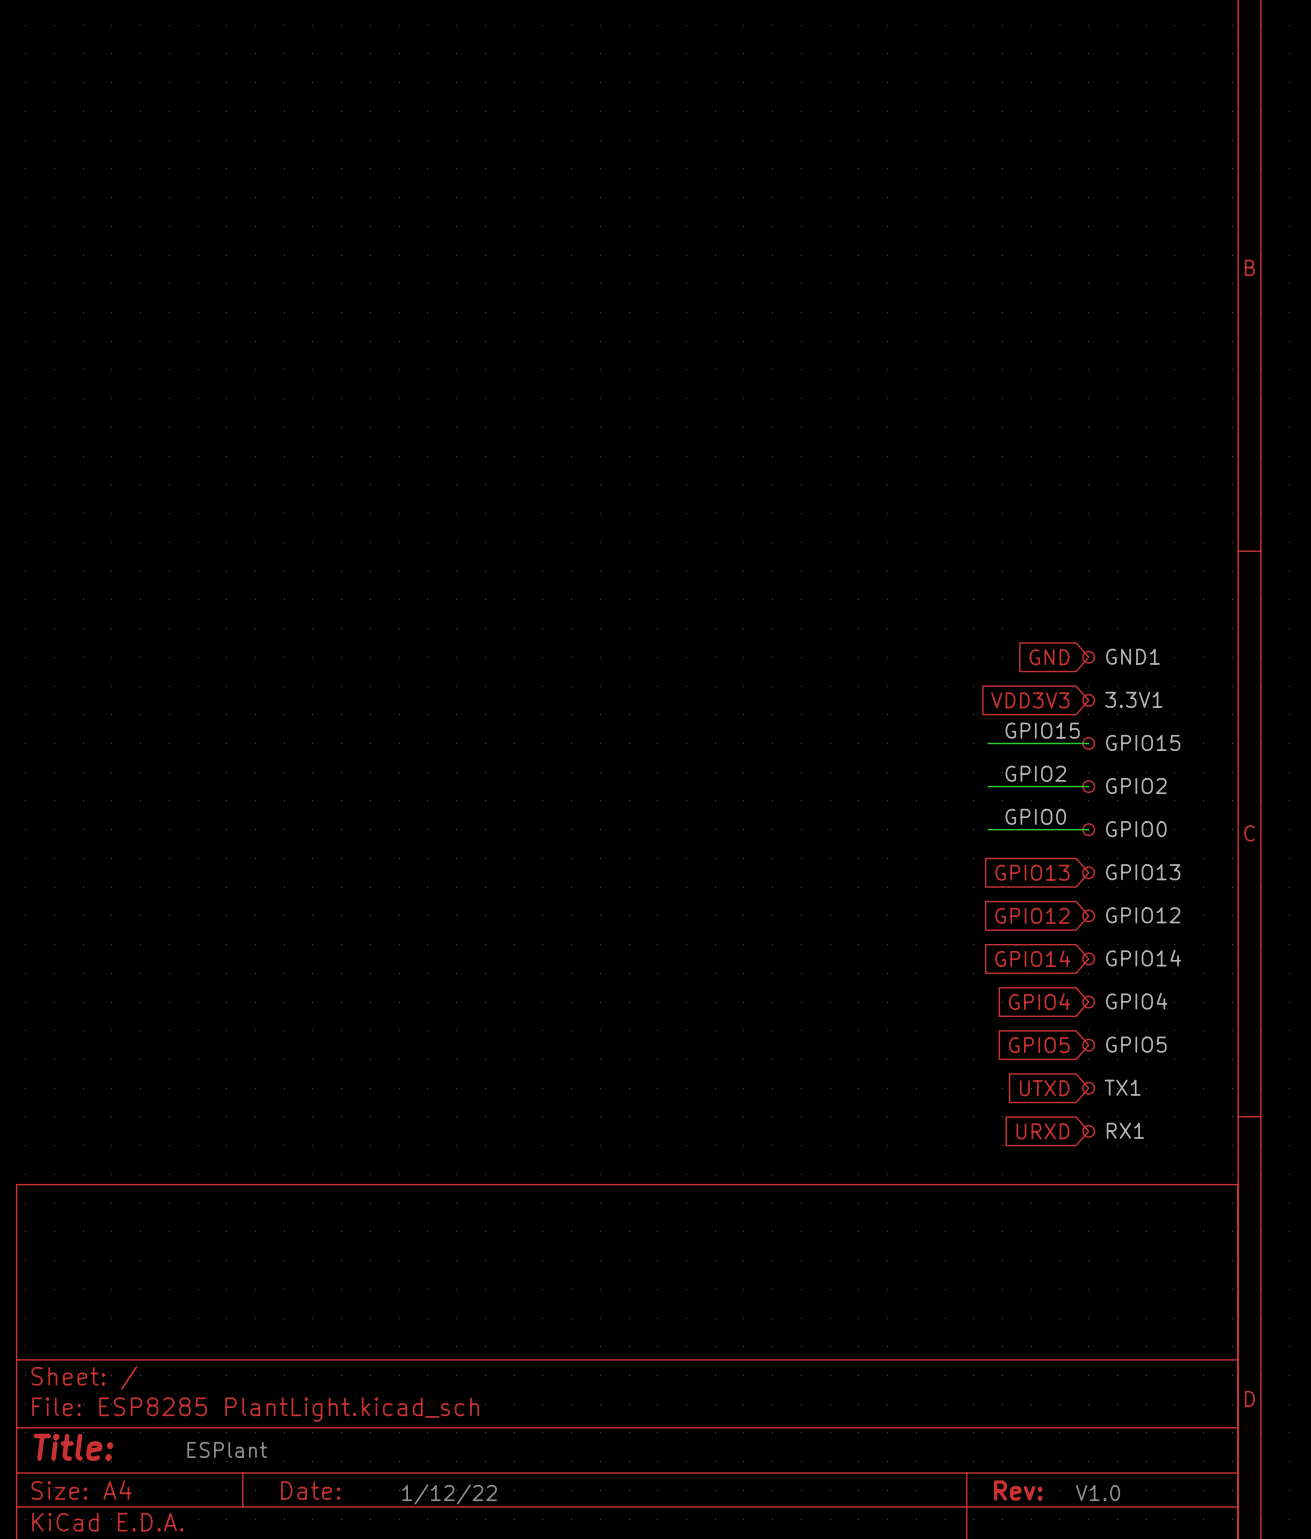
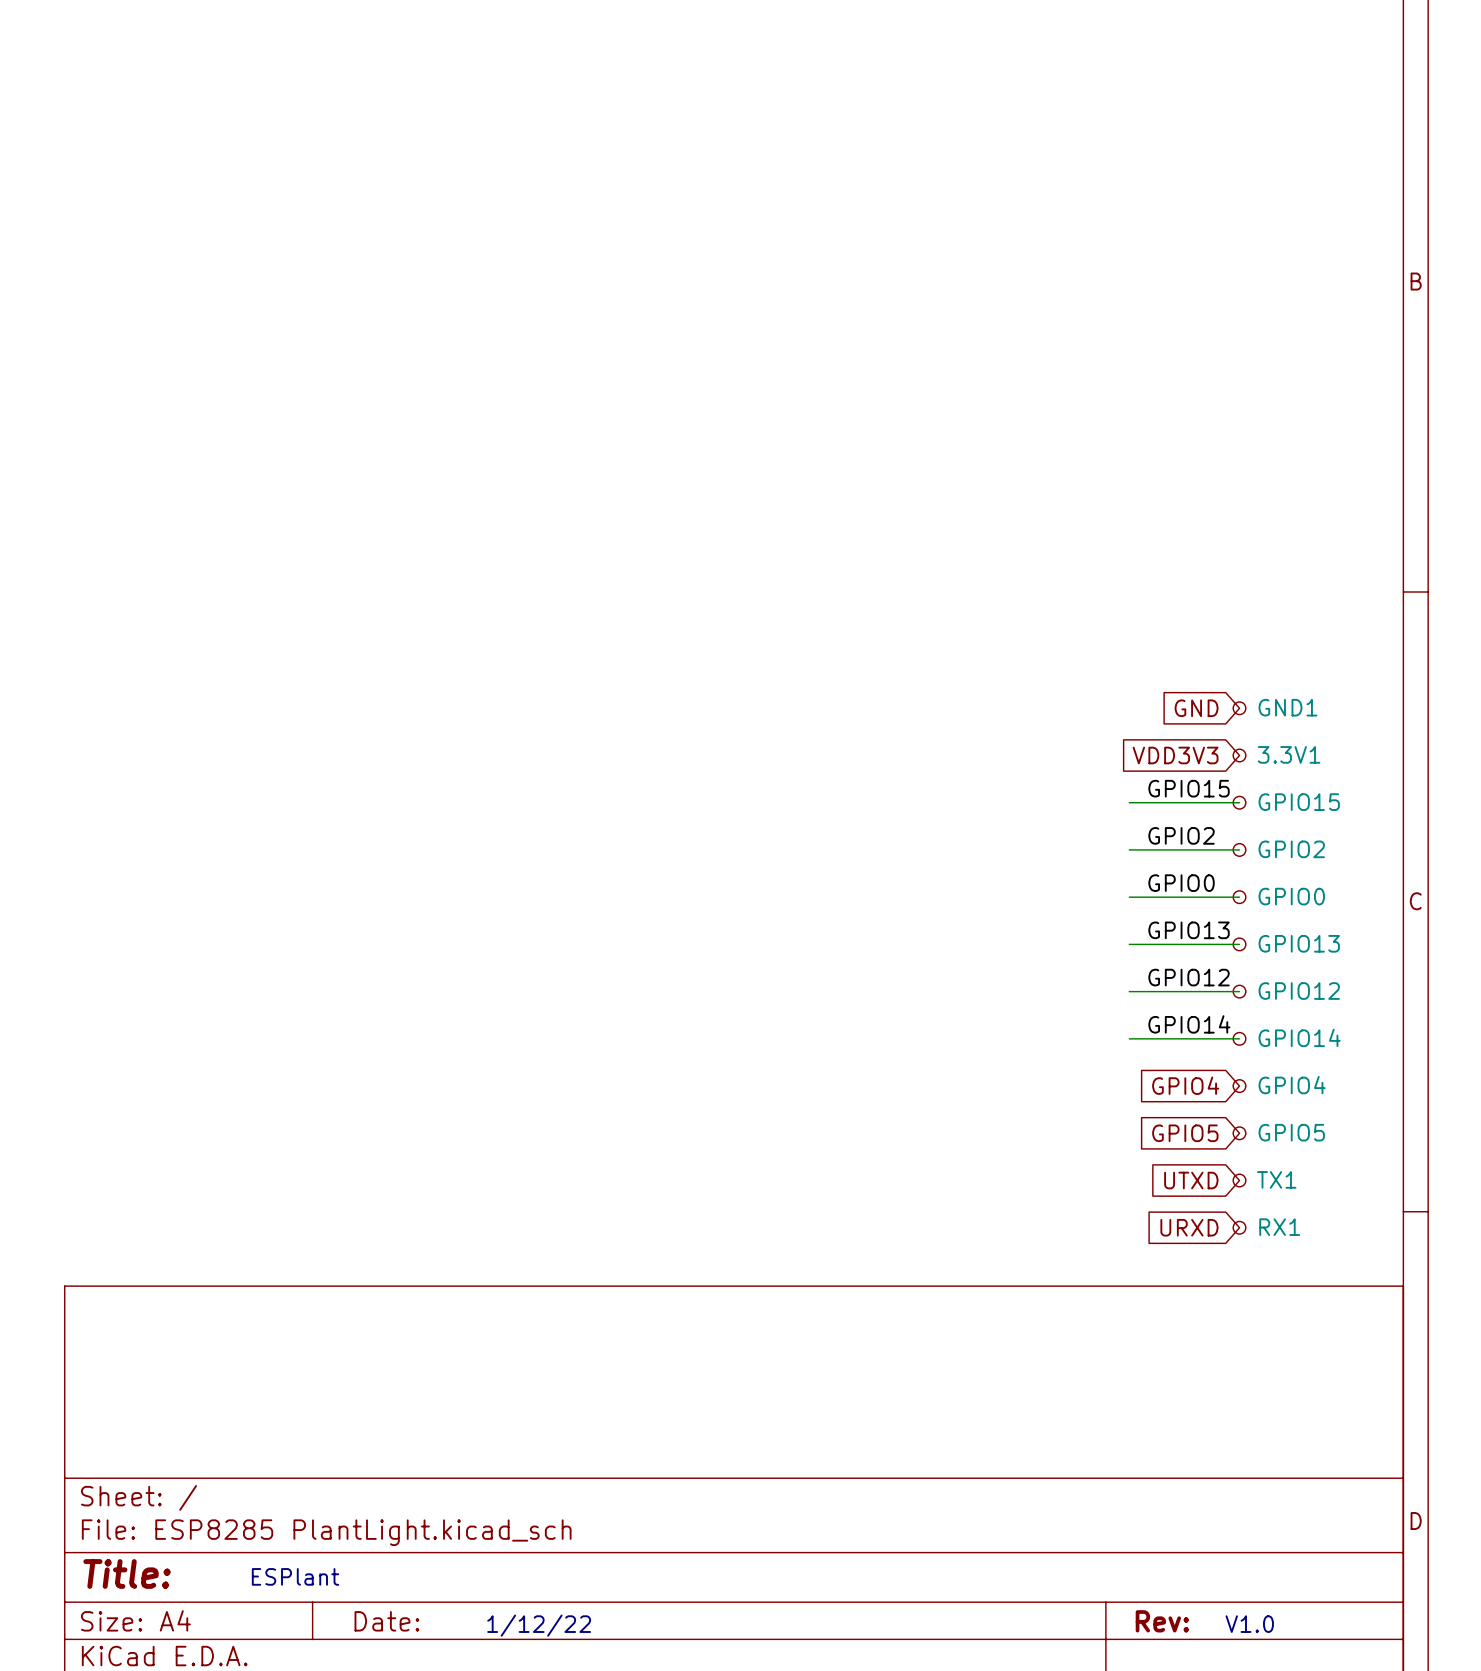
label: none -> GPIO13 (1189, 930)
wire: none -> (1129, 944) (1239, 944)
global label: GPIO13 (1032, 872) -> none
label: none -> GPIO12 (1189, 977)
wire: none -> (1129, 991) (1239, 991)
global label: GPIO12 (1032, 915) -> none
label: none -> GPIO14 (1189, 1024)
wire: none -> (1129, 1038) (1239, 1038)
global label: GPIO14 (1032, 958) -> none

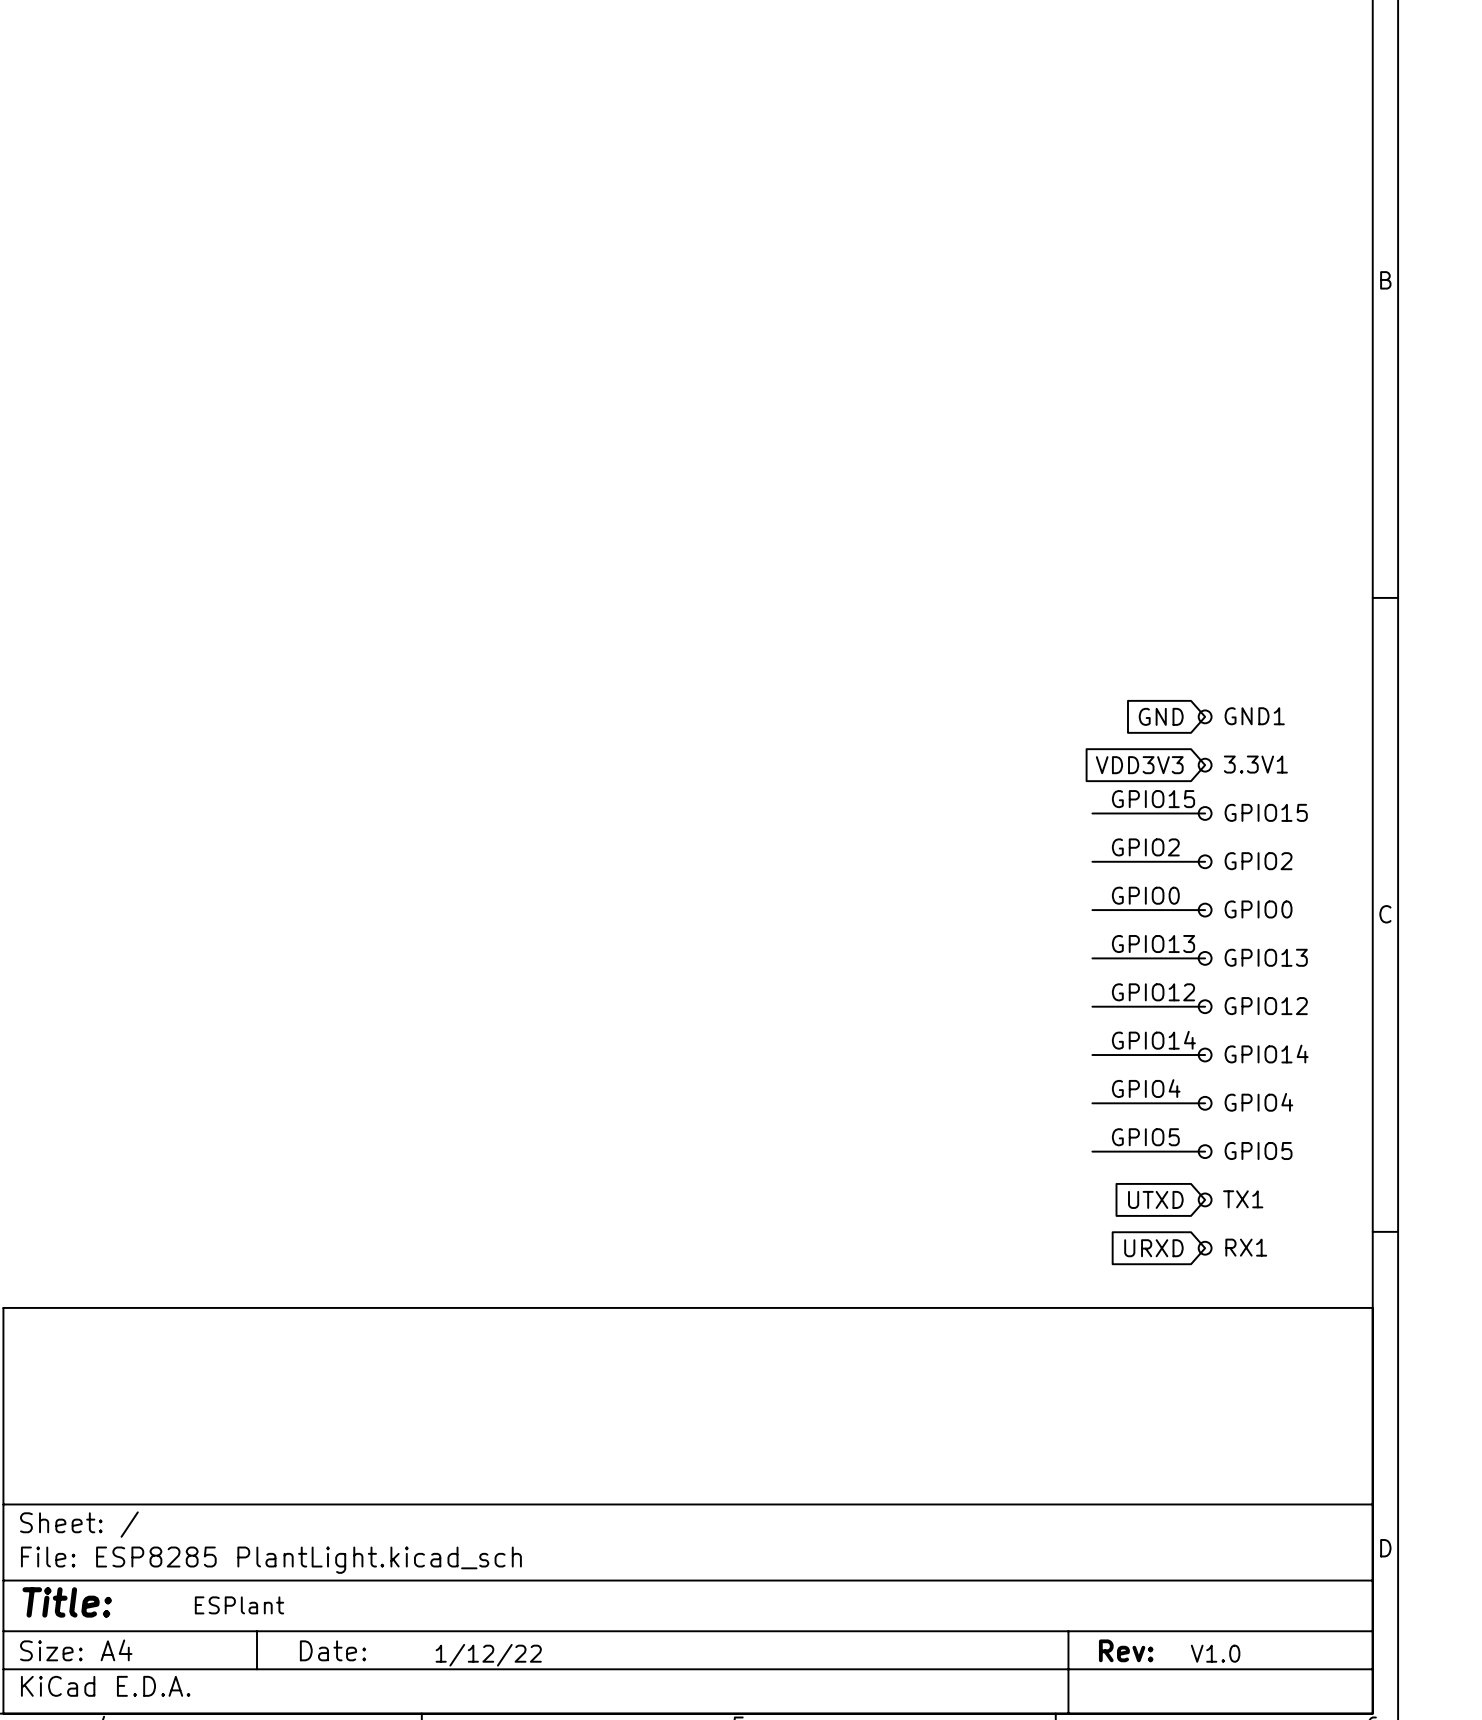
label: none -> GPIO4 (1146, 1088)
global label: GPIO4 (1185, 1085) -> none
wire: none -> (1092, 1103) (1205, 1103)
label: none -> GPIO5 (1145, 1137)
wire: none -> (1092, 1151) (1205, 1151)
global label: GPIO5 (1185, 1133) -> none

